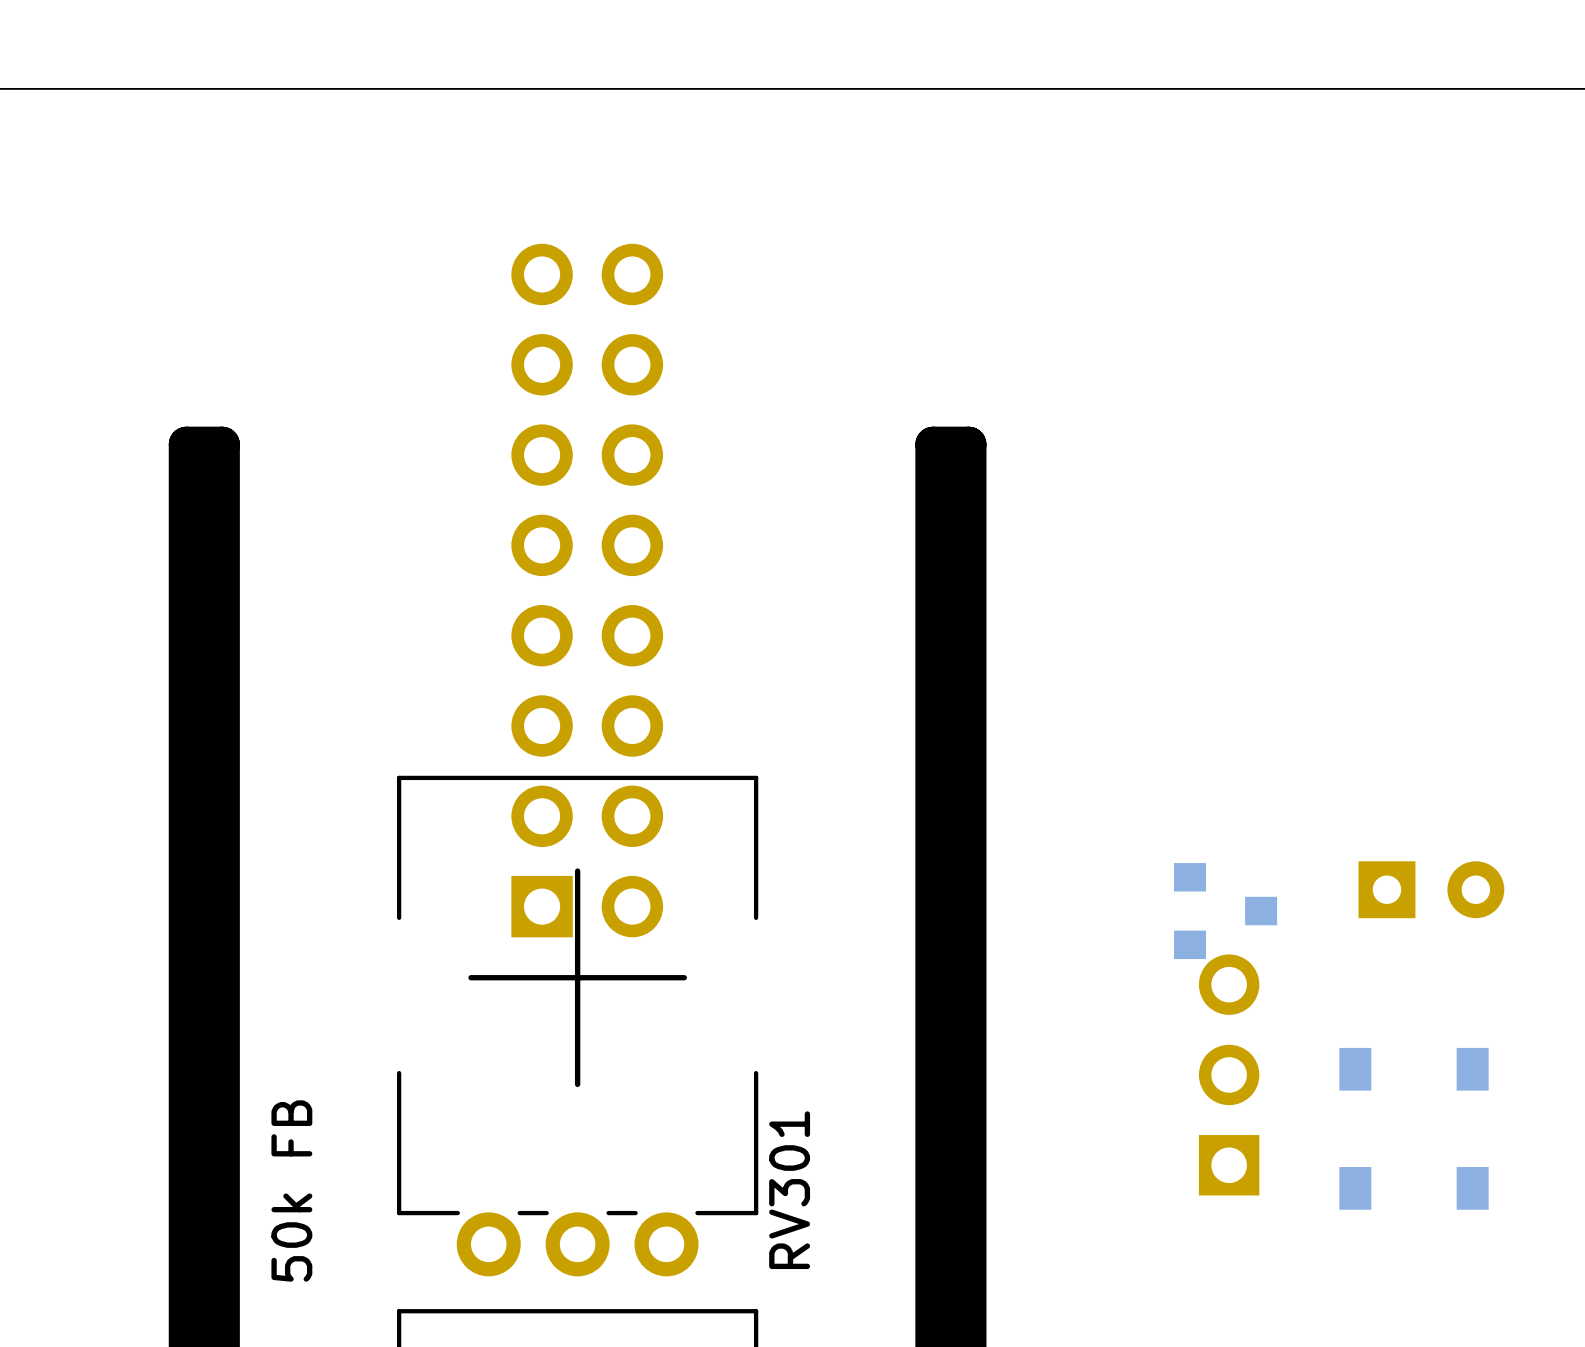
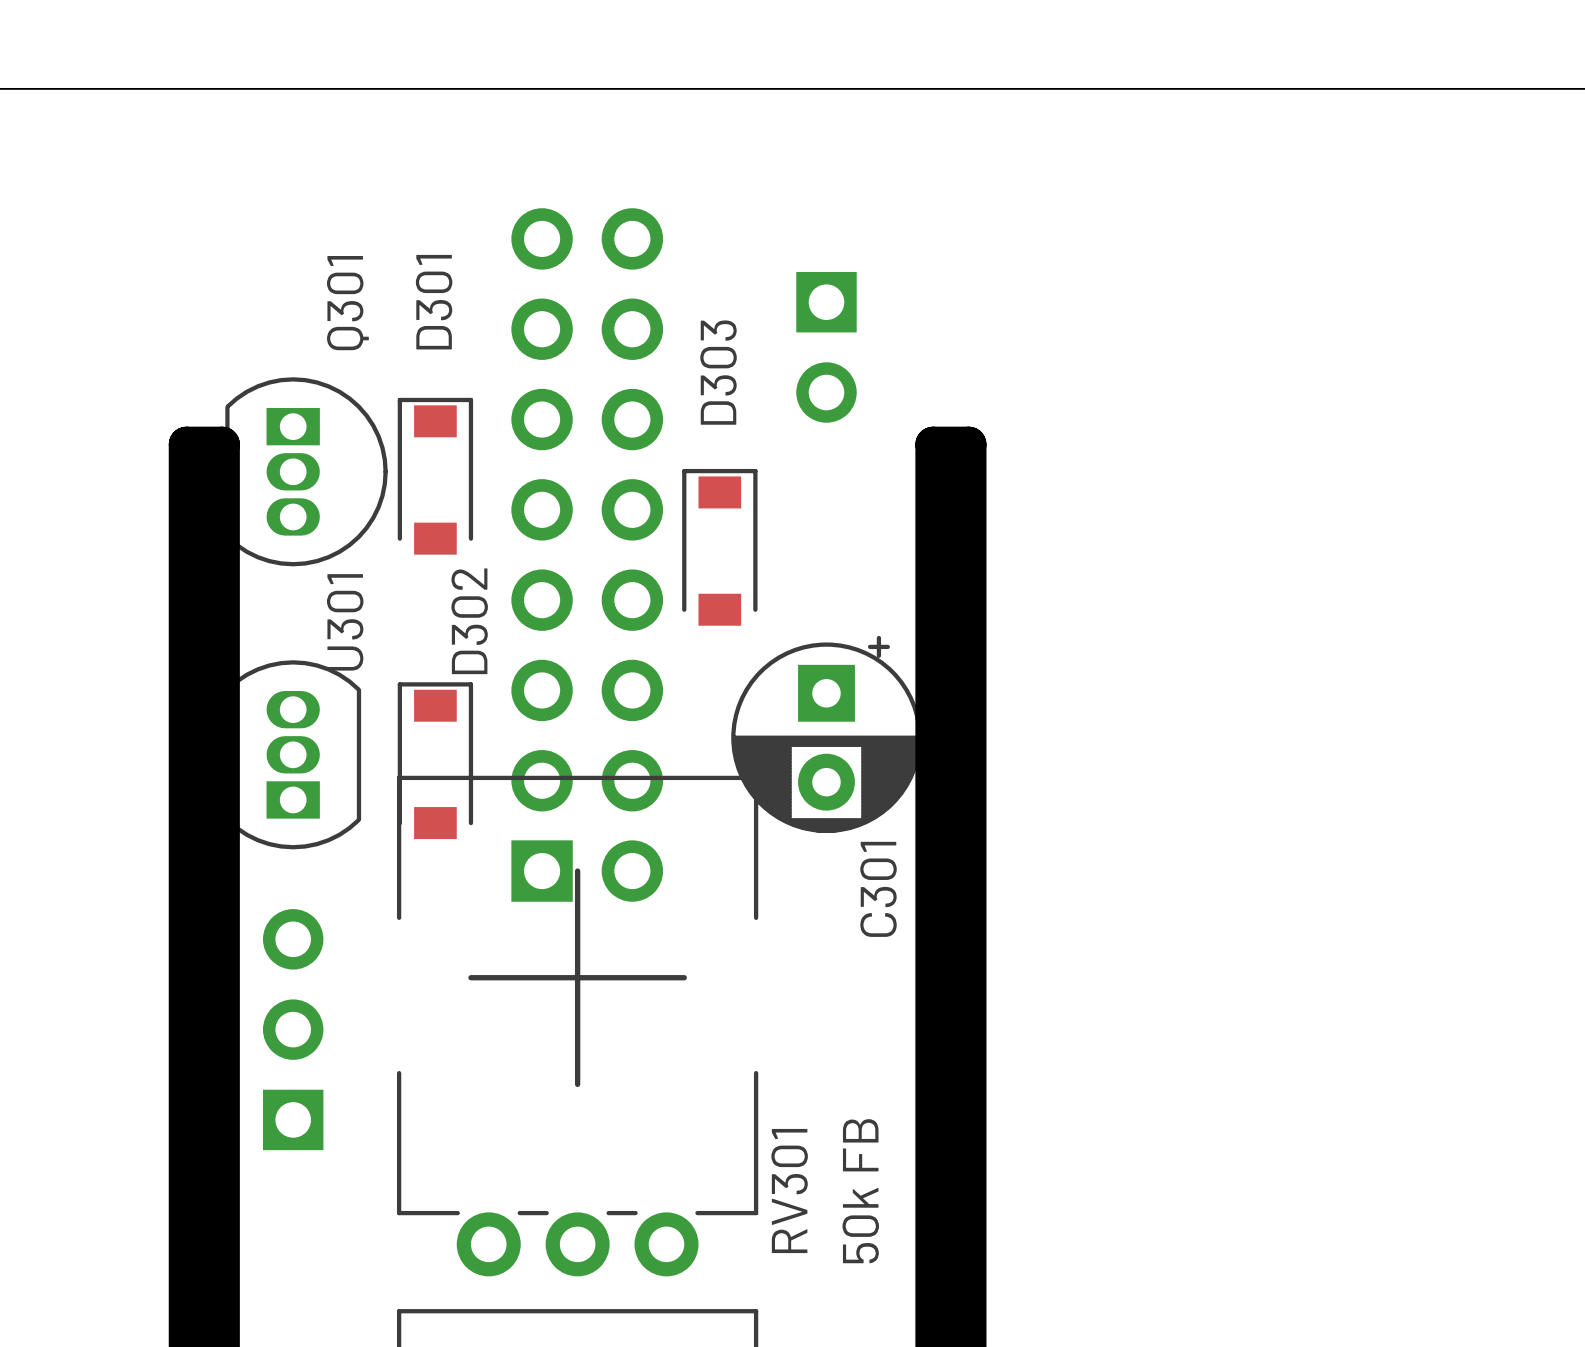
part: none -> (826, 347)
Q301: none -> (306, 471)
D301: none -> (435, 476)
D303: none -> (719, 547)
part position: (587, 590) -> (587, 554)
U301: none -> (279, 754)
D302: none -> (435, 760)
C301 side: bottom (1431, 889) -> top (826, 734)
part: (1225, 911) -> none
part: none -> (293, 1029)
part: (1414, 1069) -> none
part: (1229, 1074) -> none
part: (1414, 1188) -> none
RV301 value position: 50k FB (291, 1191) -> 50k FB (860, 1191)

